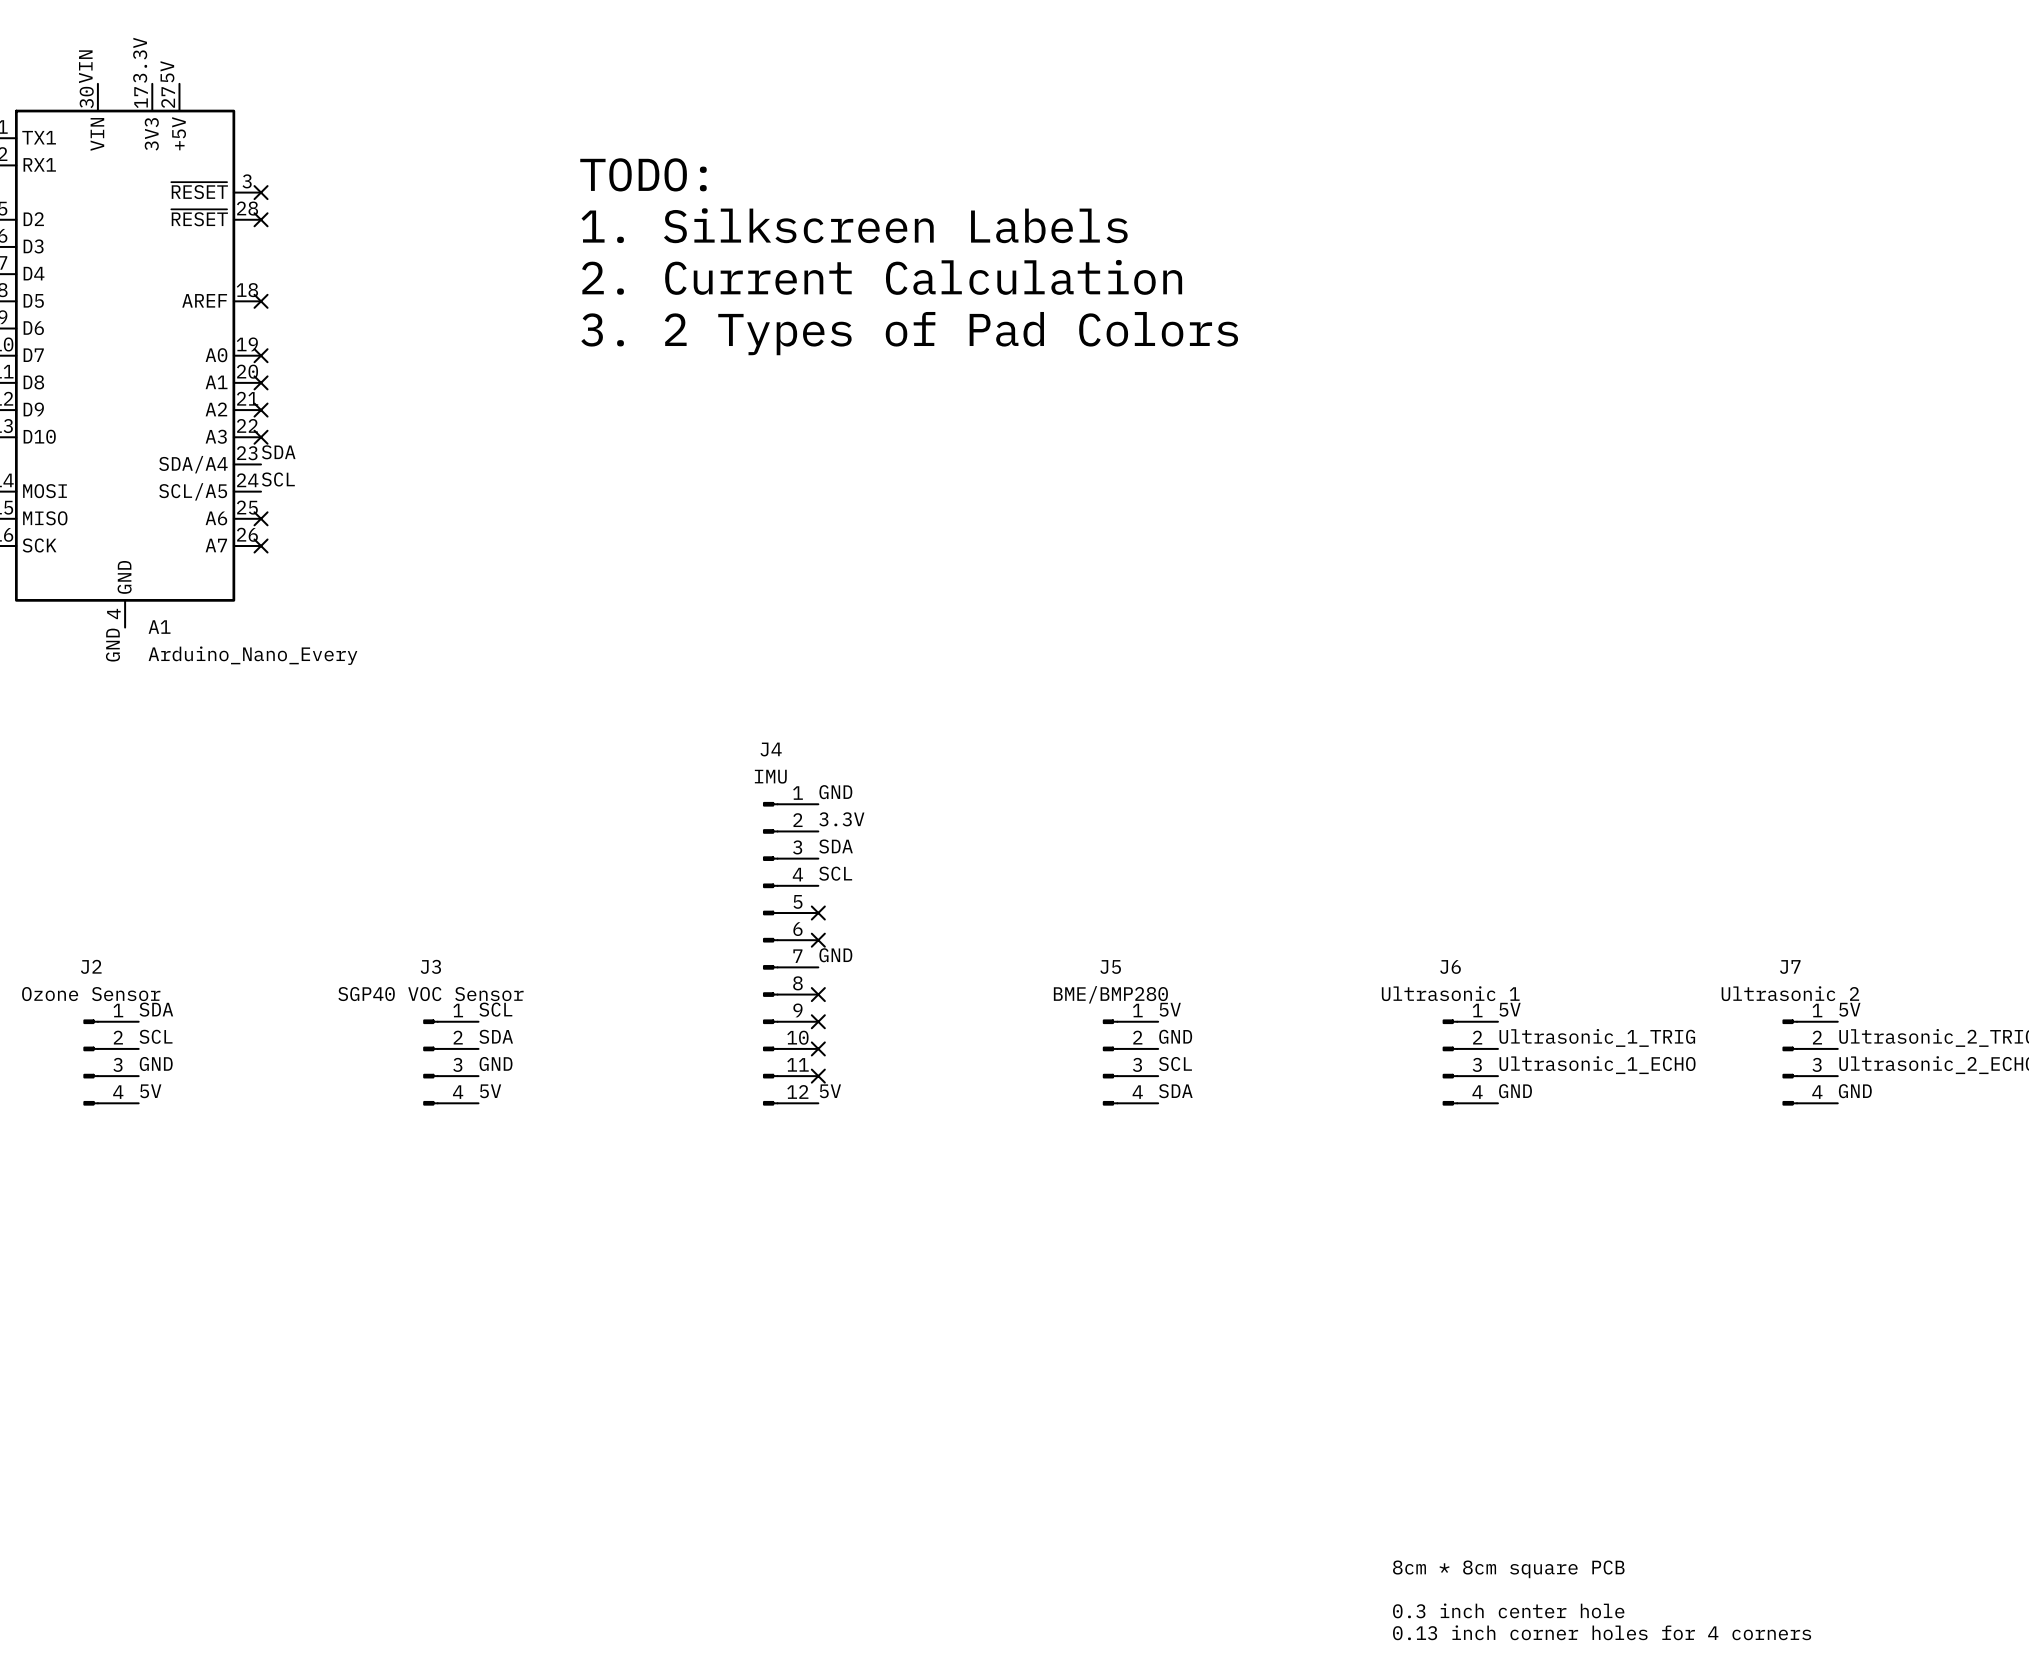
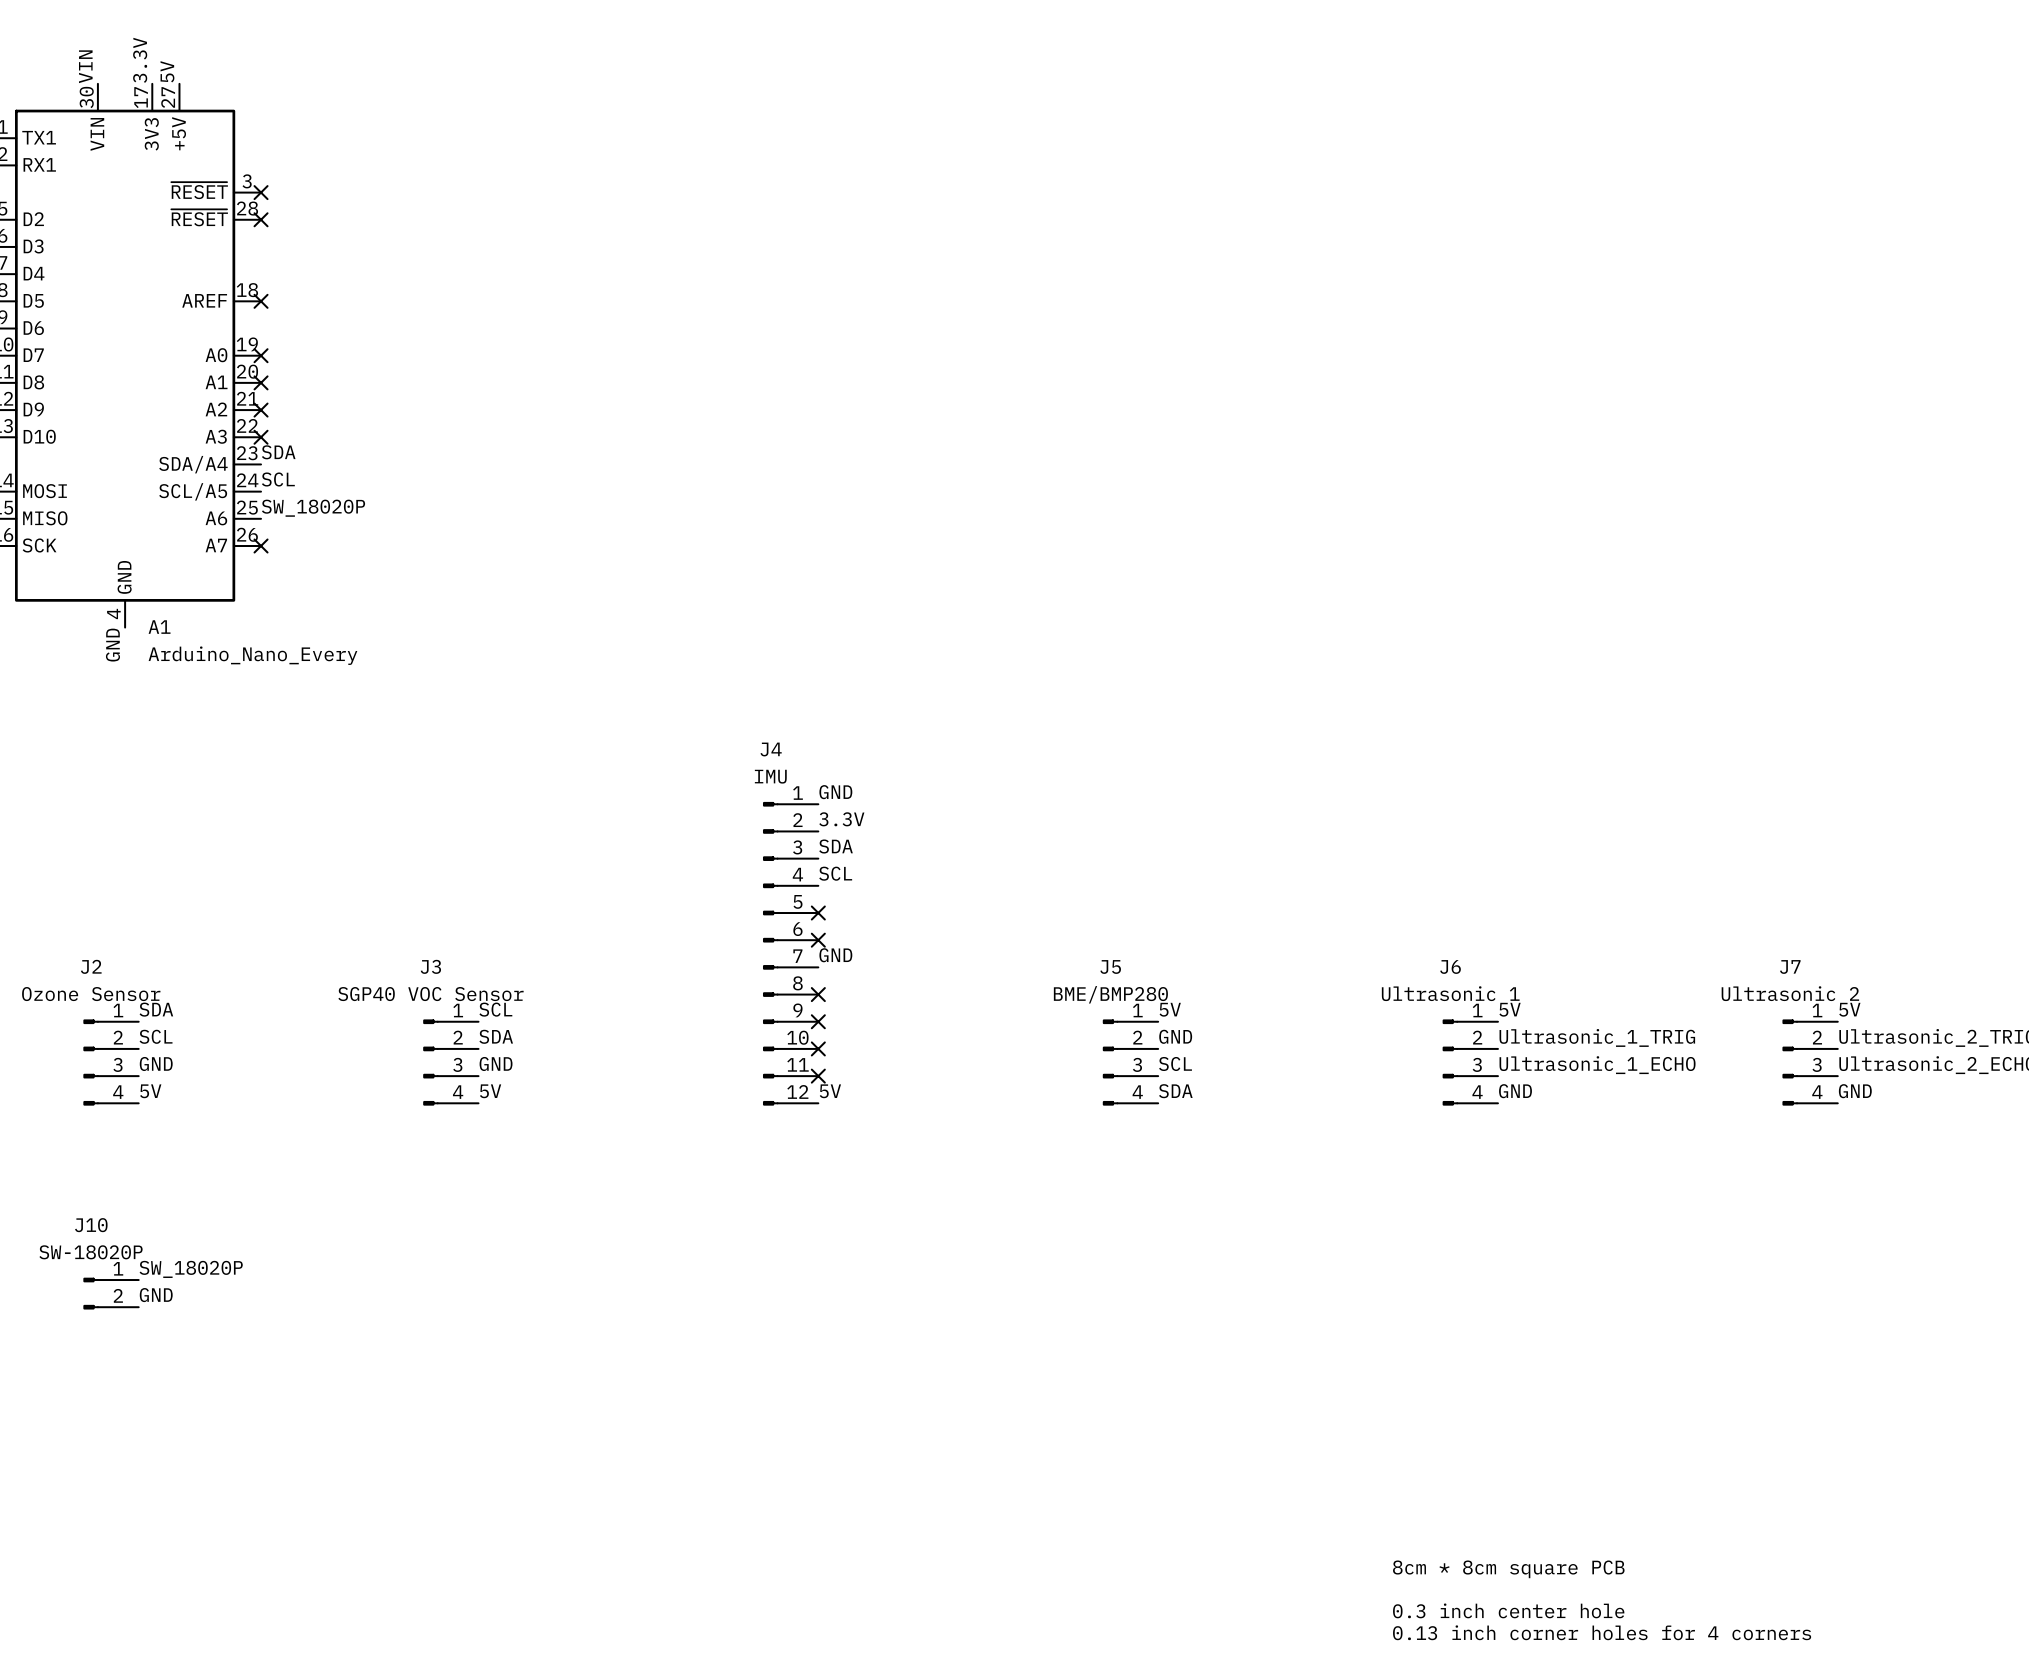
text: TODO: (643, 174) -> none
text: 1. Silkscreen Labels (854, 225) -> none
text: 2. Current Calculation (882, 277) -> none
text: 3. 2 Types of Pad Colors (909, 333) -> none
label: none -> SW_18020P (313, 508)
no-connect mark: (261, 518) -> none
label: none -> SW_18020P (191, 1269)
J10: none -> SW-18020P (111, 1293)
label: none -> GND (156, 1295)

